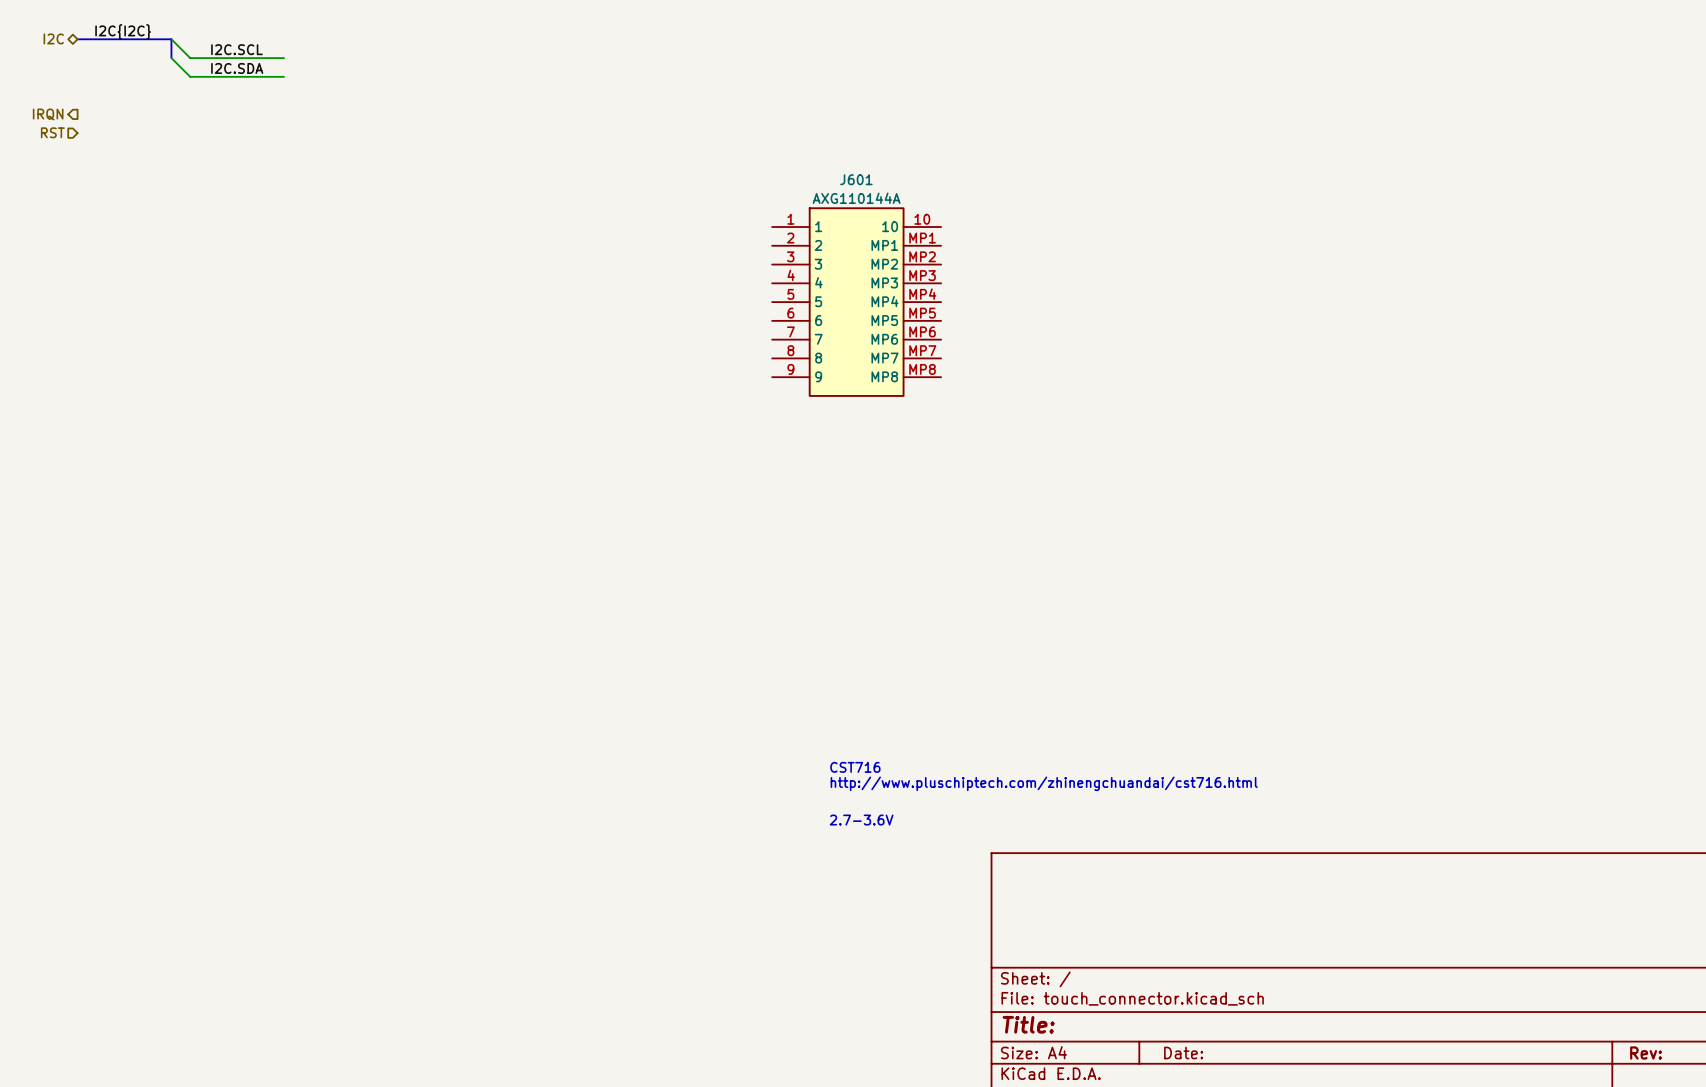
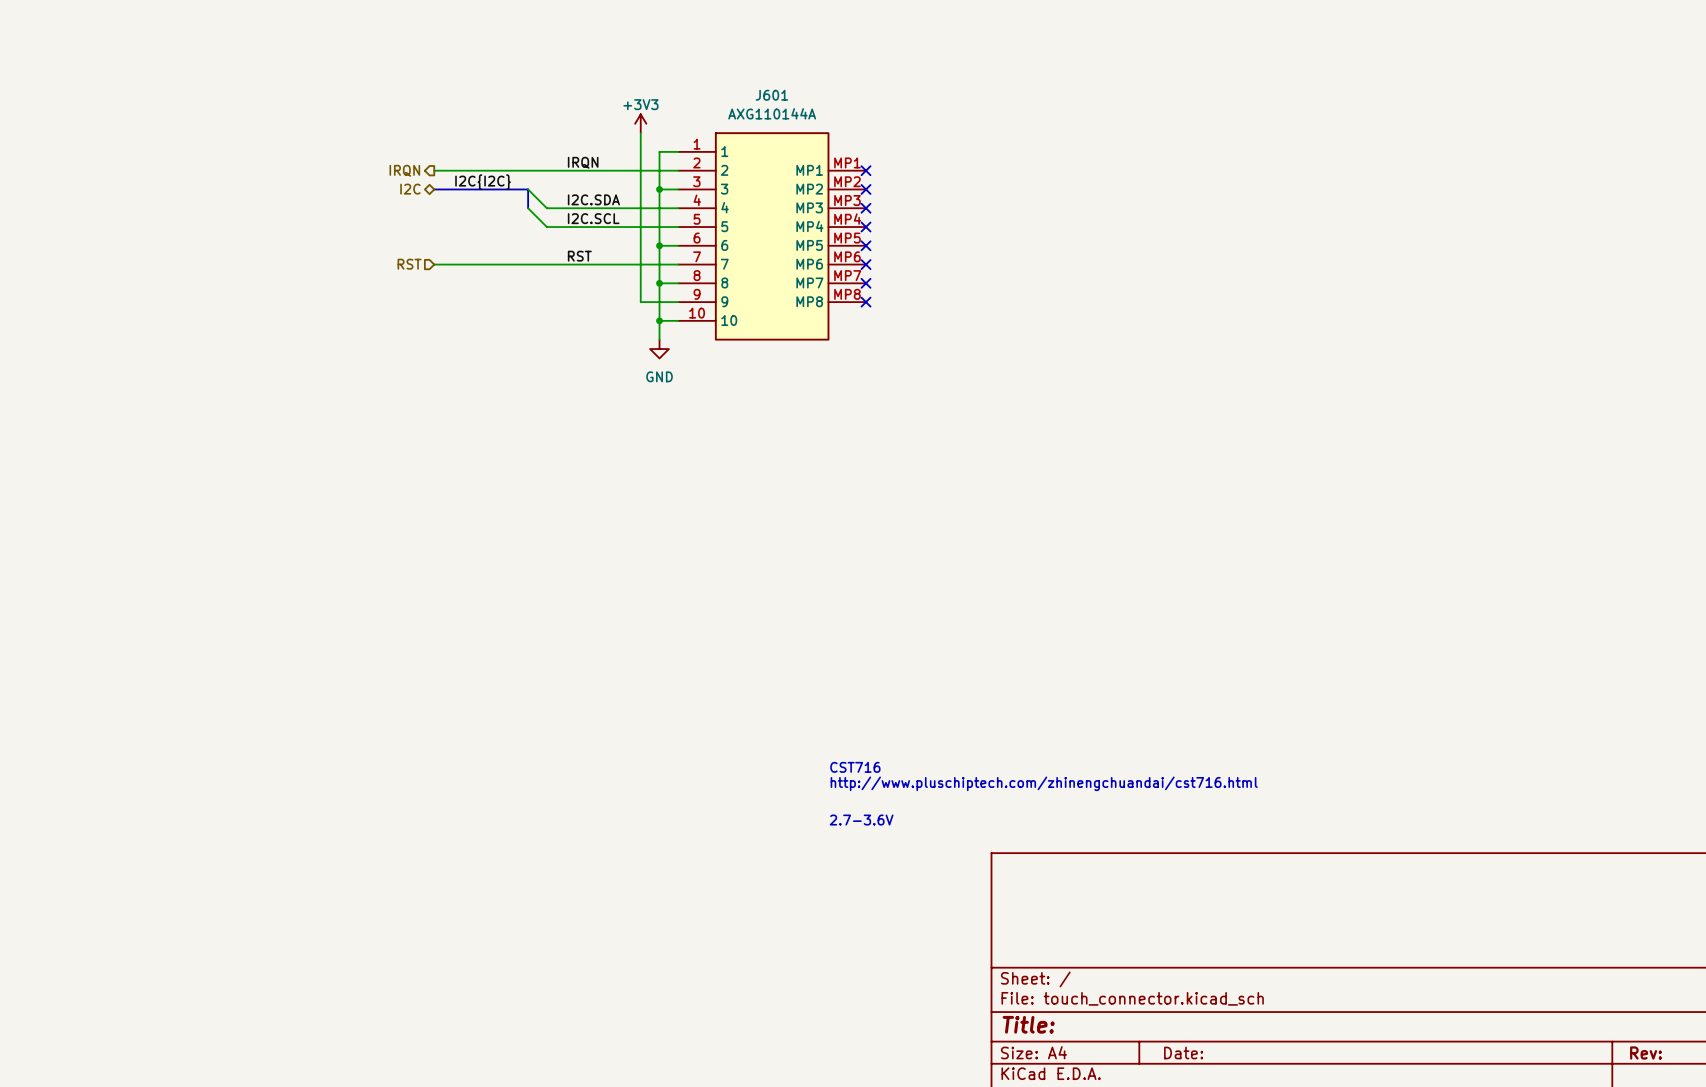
label: I2C{I2C} (123, 32) -> none
hierarchical label: I2C (53, 38) -> none
bus: (77, 39) (171, 39) (171, 58) -> none
wire: (171, 39) (190, 58) (284, 58) -> none
label: I2C.SCL (237, 49) -> none
wire: (171, 58) (190, 76) (284, 76) -> none
label: I2C.SDA (237, 68) -> none
hierarchical label: IRQN (48, 114) -> none
power symbol: none -> +3V3 (640, 123)
hierarchical label: RST (52, 132) -> none
wire: none -> (640, 133) (640, 302) (678, 302)
wire: none -> (678, 151) (659, 151) (659, 339)
label: none -> IRQN (583, 162)
hierarchical label: none -> IRQN (404, 170)
wire: none -> (434, 170) (678, 170)
no-connect mark: none -> (866, 170)
J601 name position: J601 (856, 179) -> J601 (771, 95)
label: none -> I2C{I2C} (483, 182)
hierarchical label: none -> I2C (410, 189)
bus: none -> (434, 189) (528, 189) (528, 208)
wire: none -> (528, 189) (546, 208) (678, 208)
wire: none -> (659, 189) (678, 189)
junction: none -> (659, 189)
no-connect mark: none -> (866, 189)
J601 value position: AXG110144A (856, 198) -> AXG110144A (772, 113)
label: none -> I2C.SDA (593, 199)
J601 symbol: [772, 207, 942, 397] -> [678, 132, 867, 341]
wire: none -> (528, 208) (546, 227) (678, 227)
no-connect mark: none -> (866, 208)
label: none -> I2C.SCL (593, 218)
no-connect mark: none -> (866, 227)
wire: none -> (659, 245) (678, 245)
junction: none -> (659, 245)
no-connect mark: none -> (866, 245)
label: none -> RST (579, 256)
hierarchical label: none -> RST (409, 264)
wire: none -> (434, 264) (678, 264)
no-connect mark: none -> (866, 264)
wire: none -> (659, 283) (678, 283)
junction: none -> (659, 283)
no-connect mark: none -> (866, 283)
no-connect mark: none -> (866, 302)
wire: none -> (659, 320) (678, 320)
junction: none -> (659, 320)
power symbol: none -> GND (659, 349)

